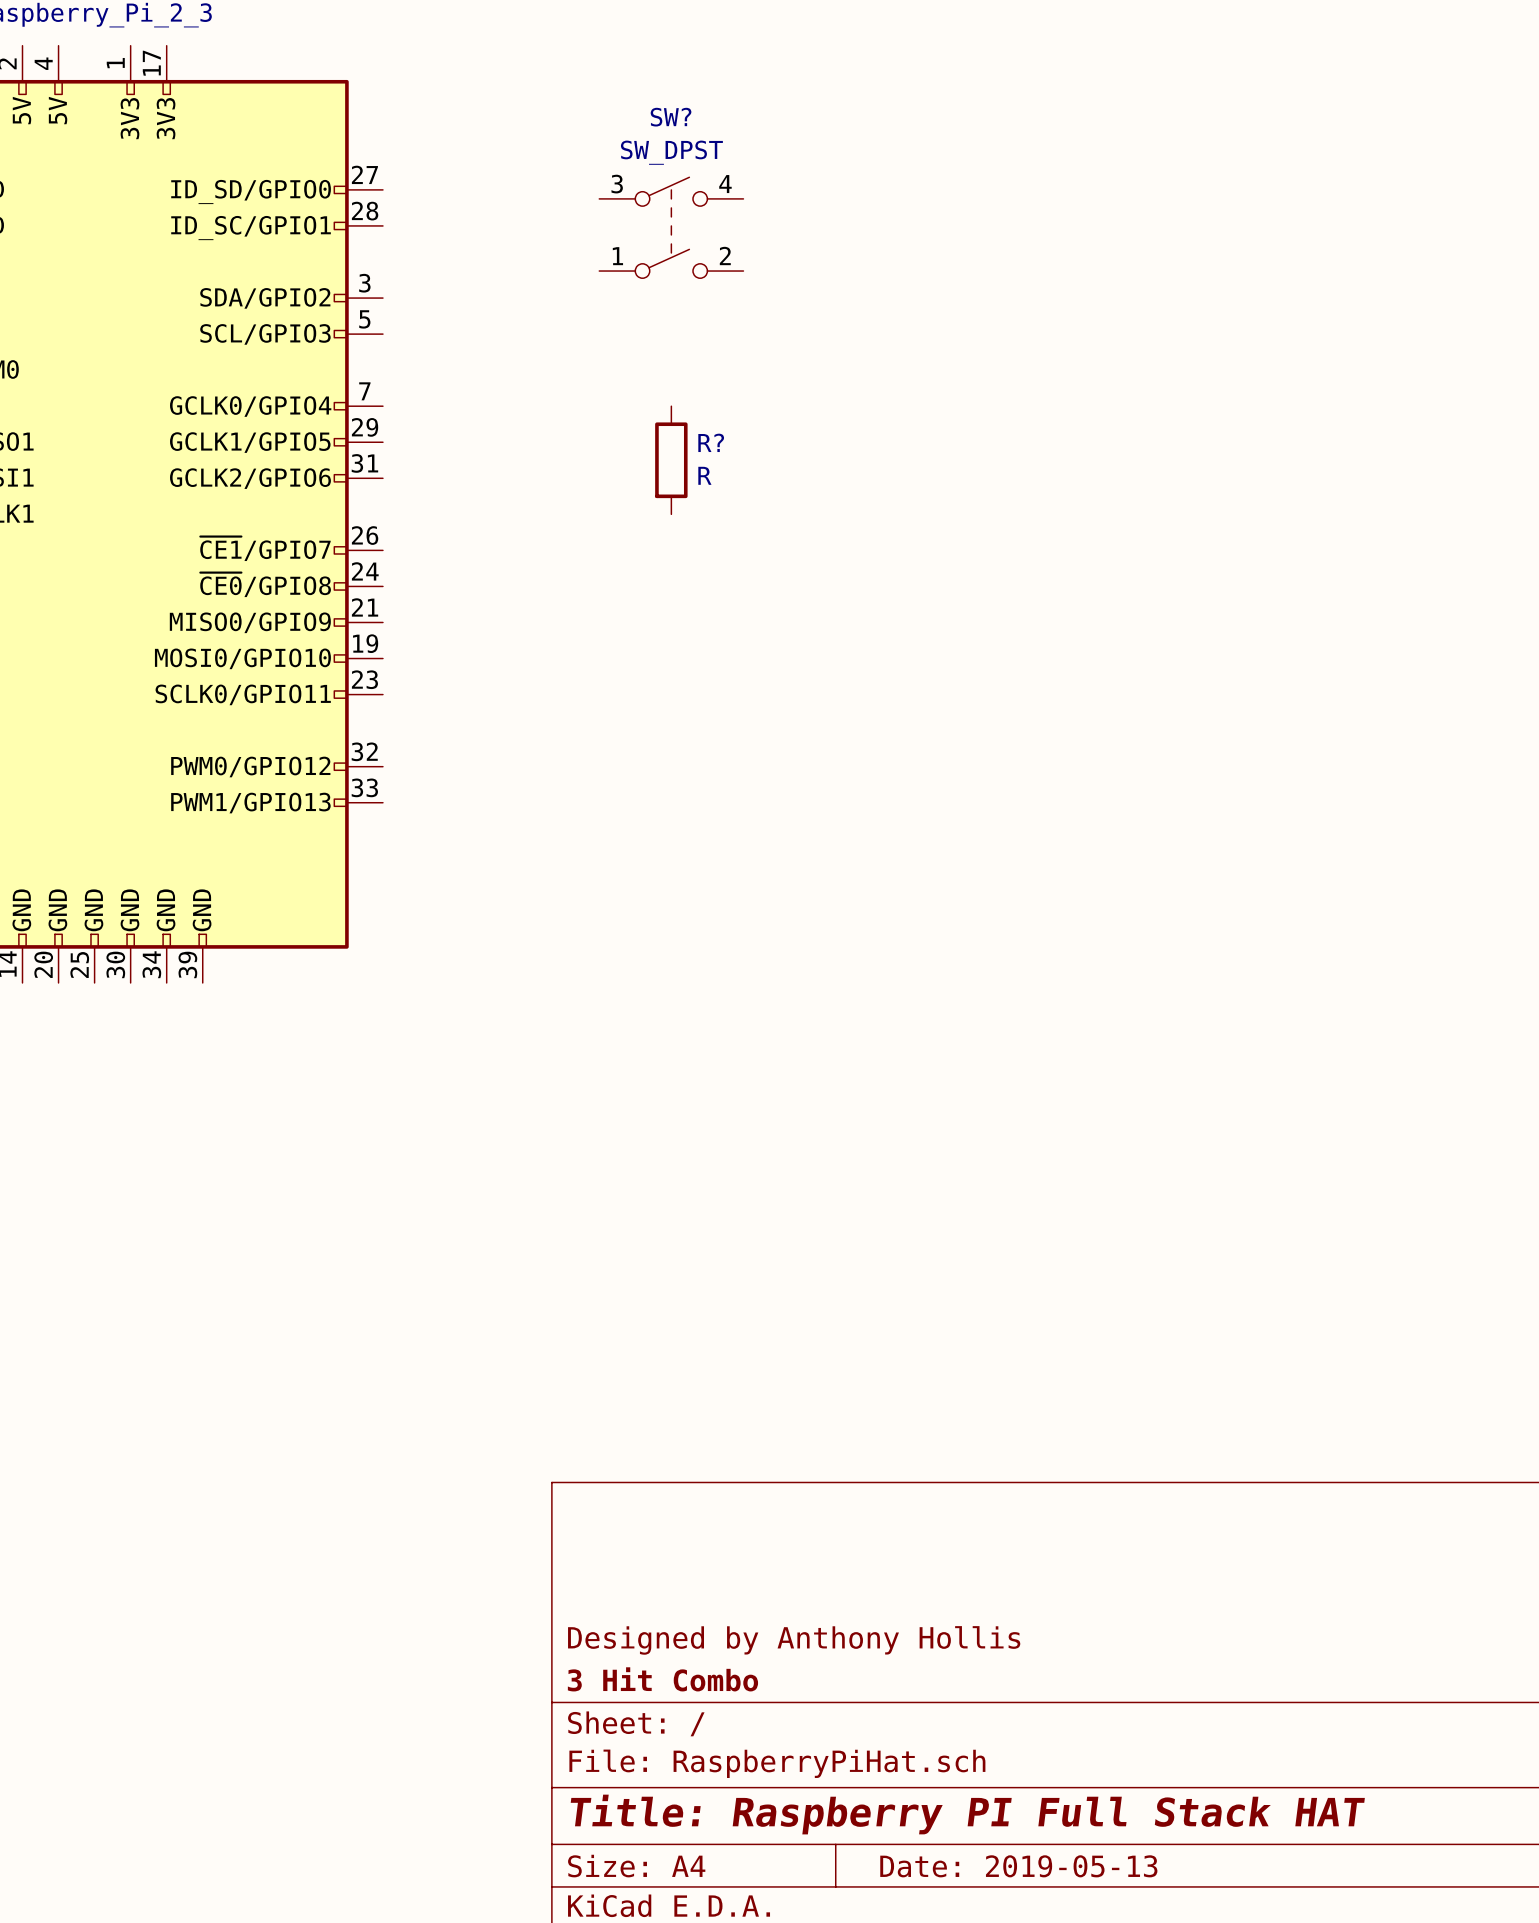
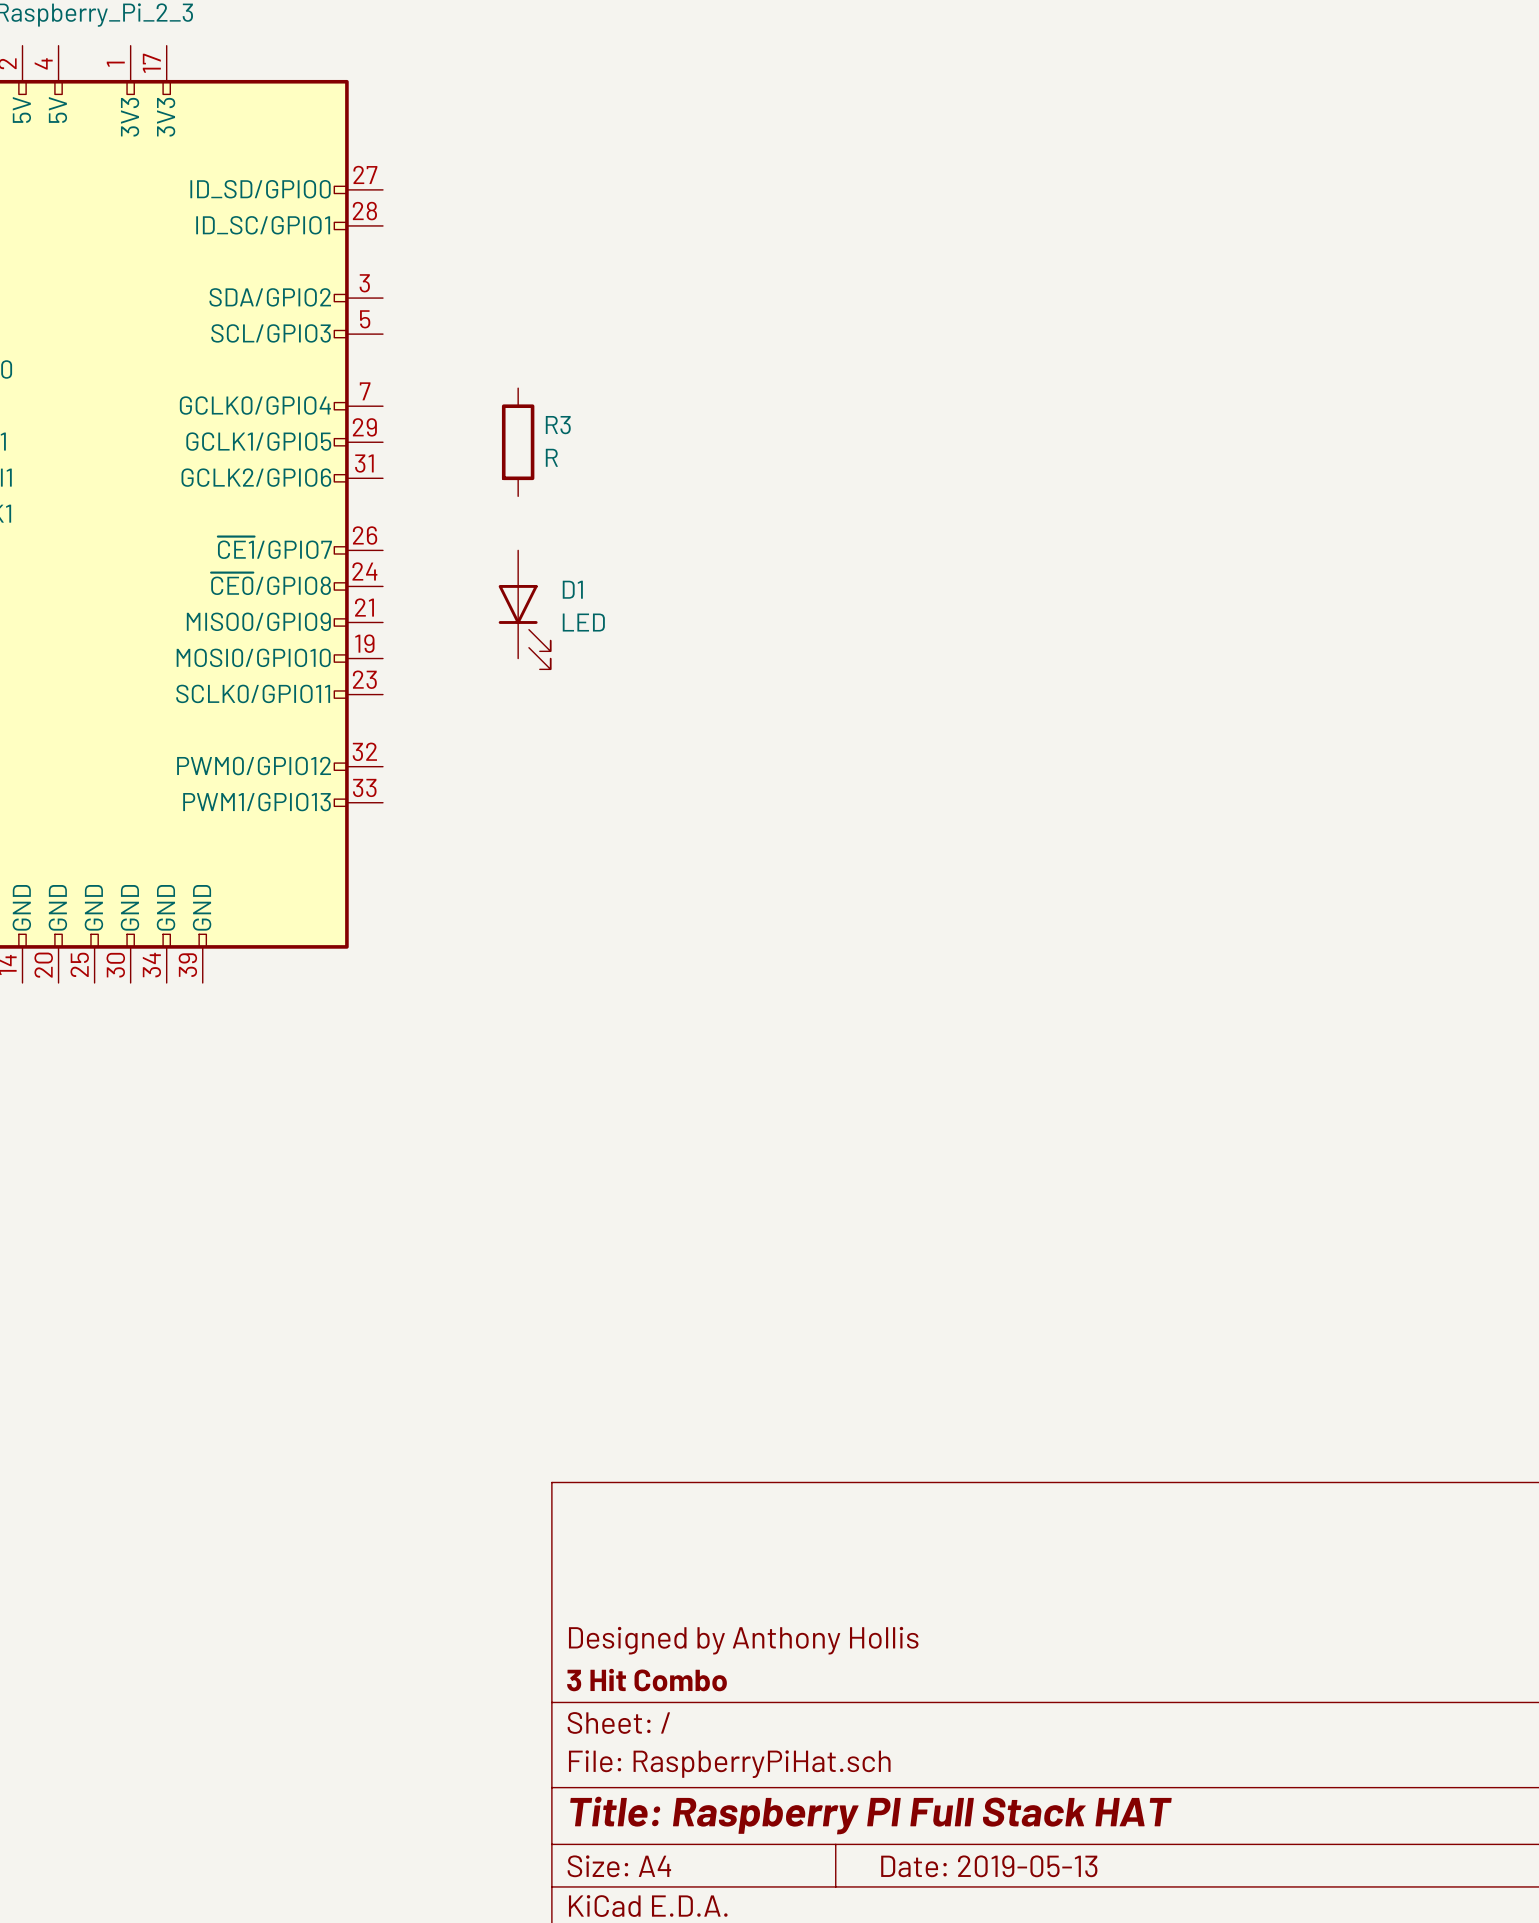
SW?: SW_DPST (671, 227) -> none
R3: none -> R (518, 442)
R?: R (671, 460) -> none
D1: none -> LED (524, 609)

